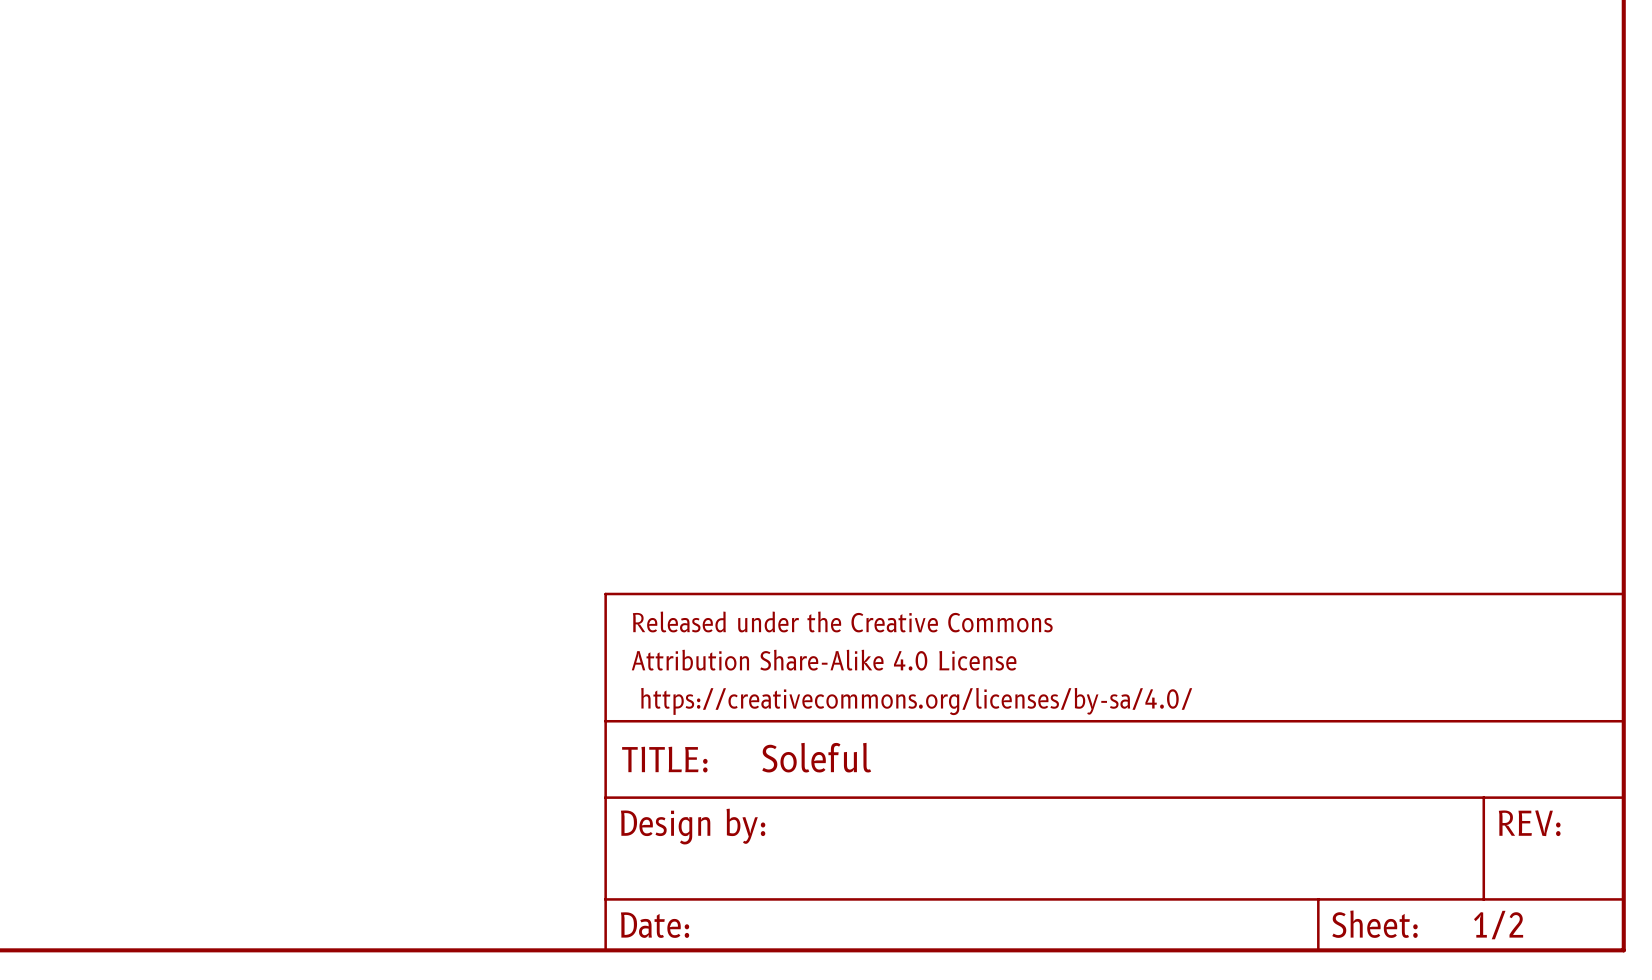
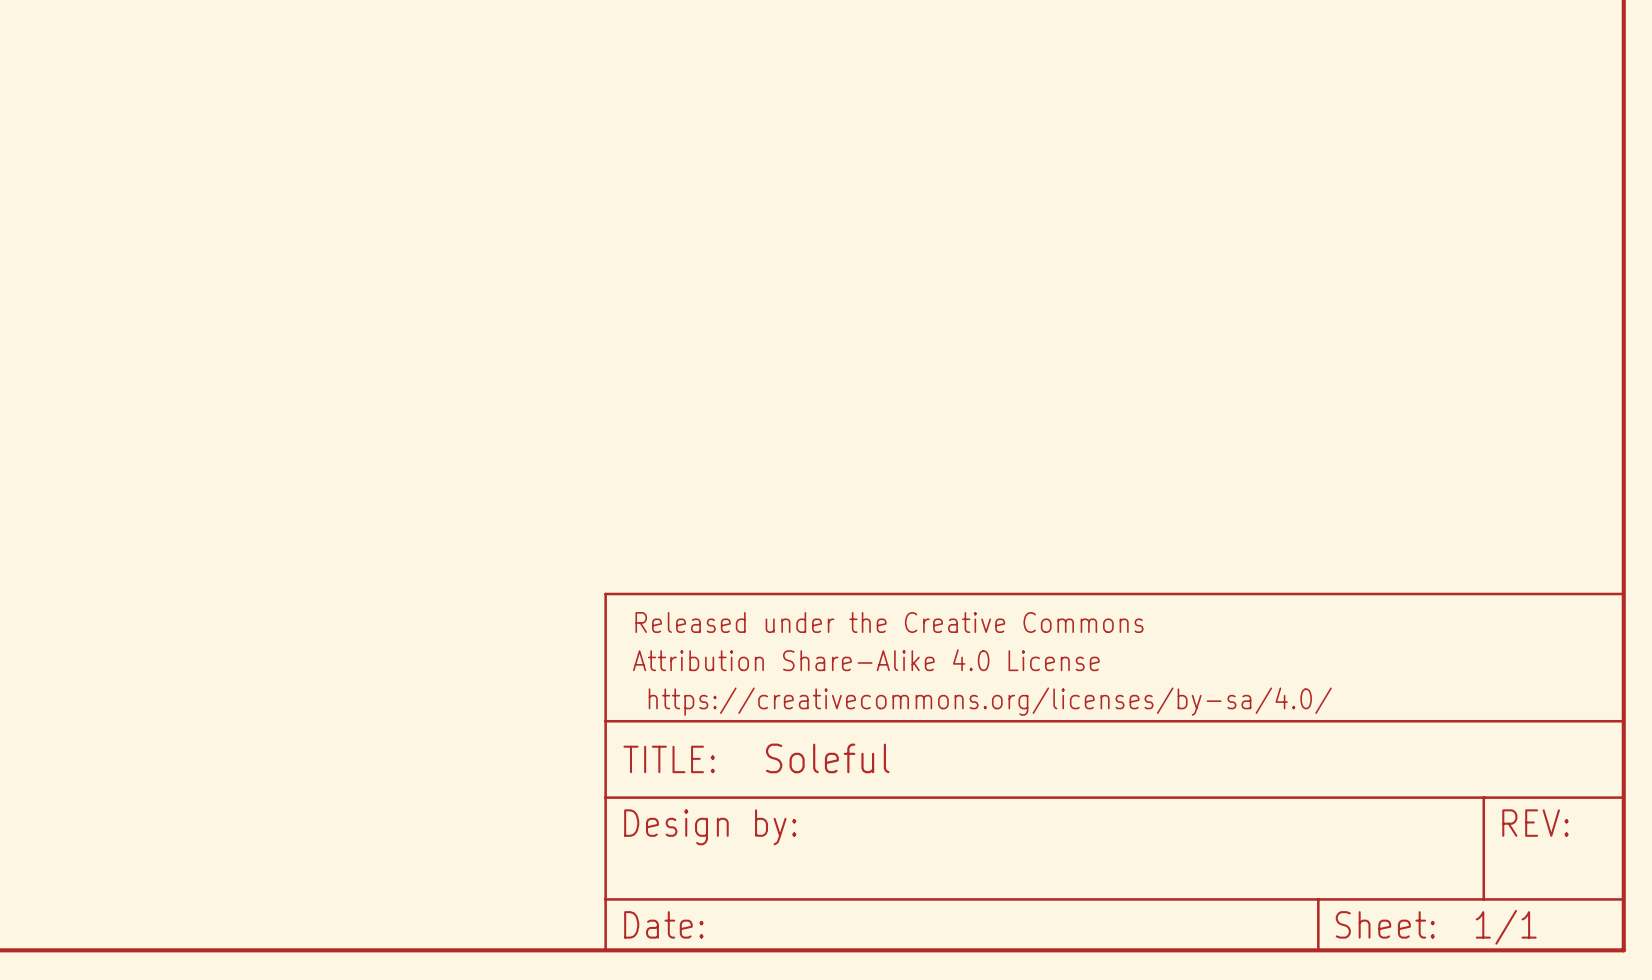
part text: 1/2 (1498, 925) -> 1/1 (1506, 927)

